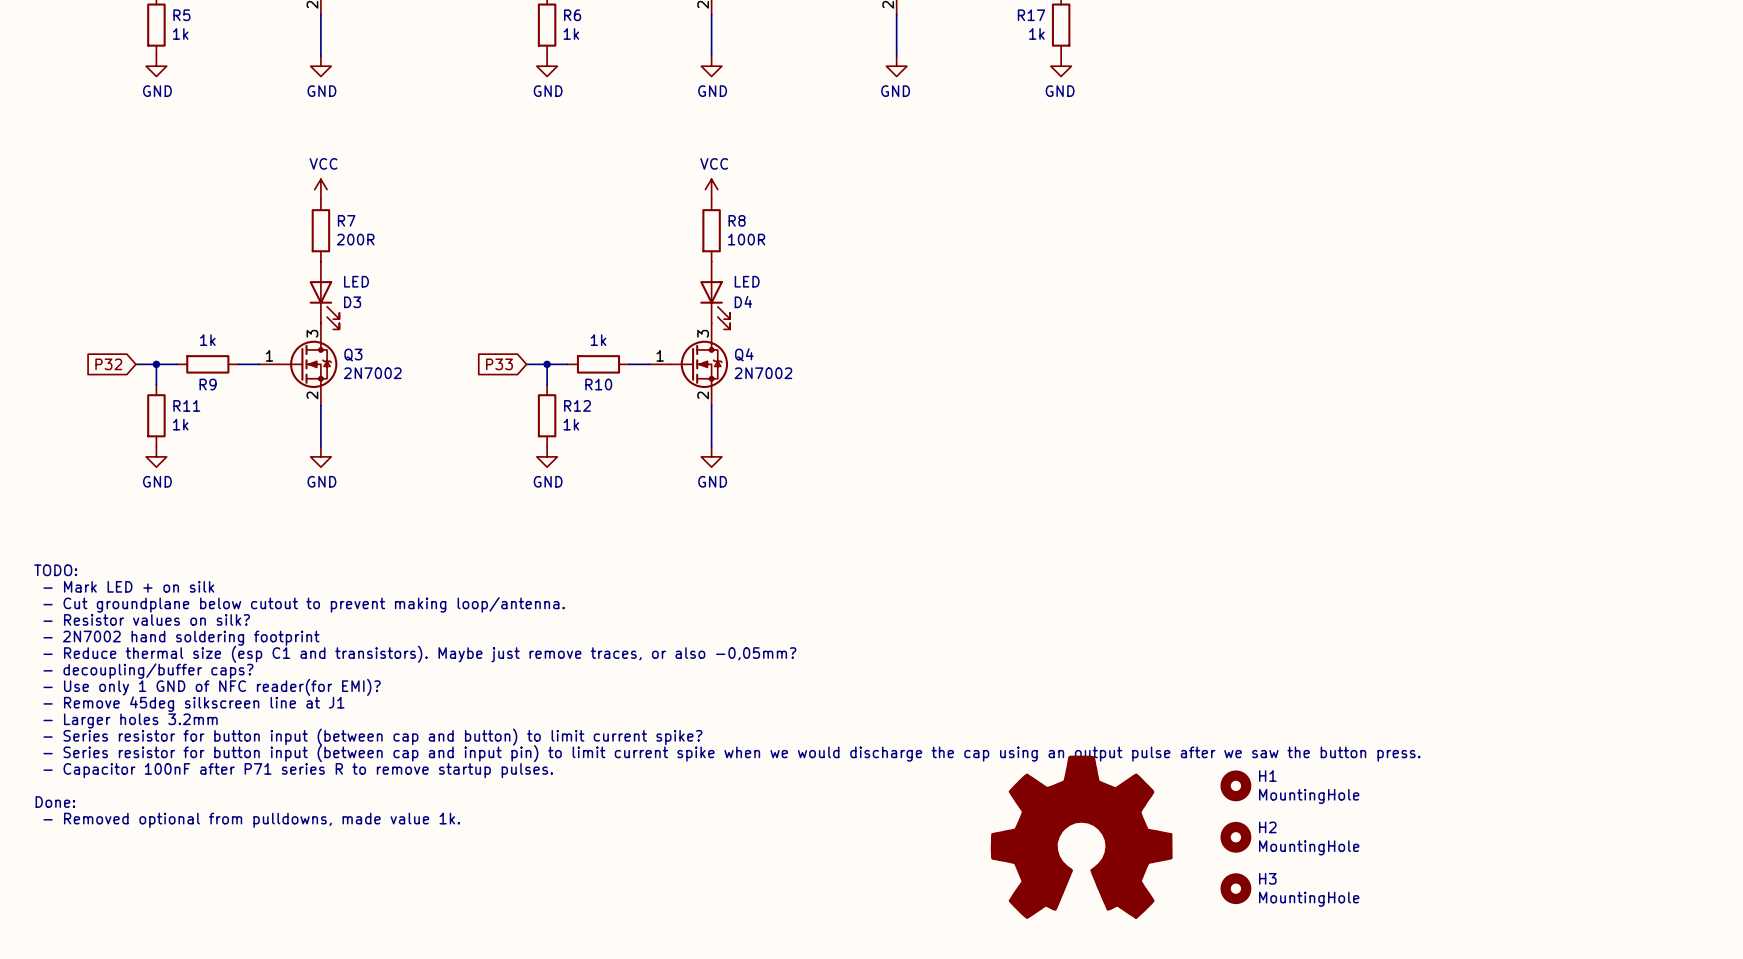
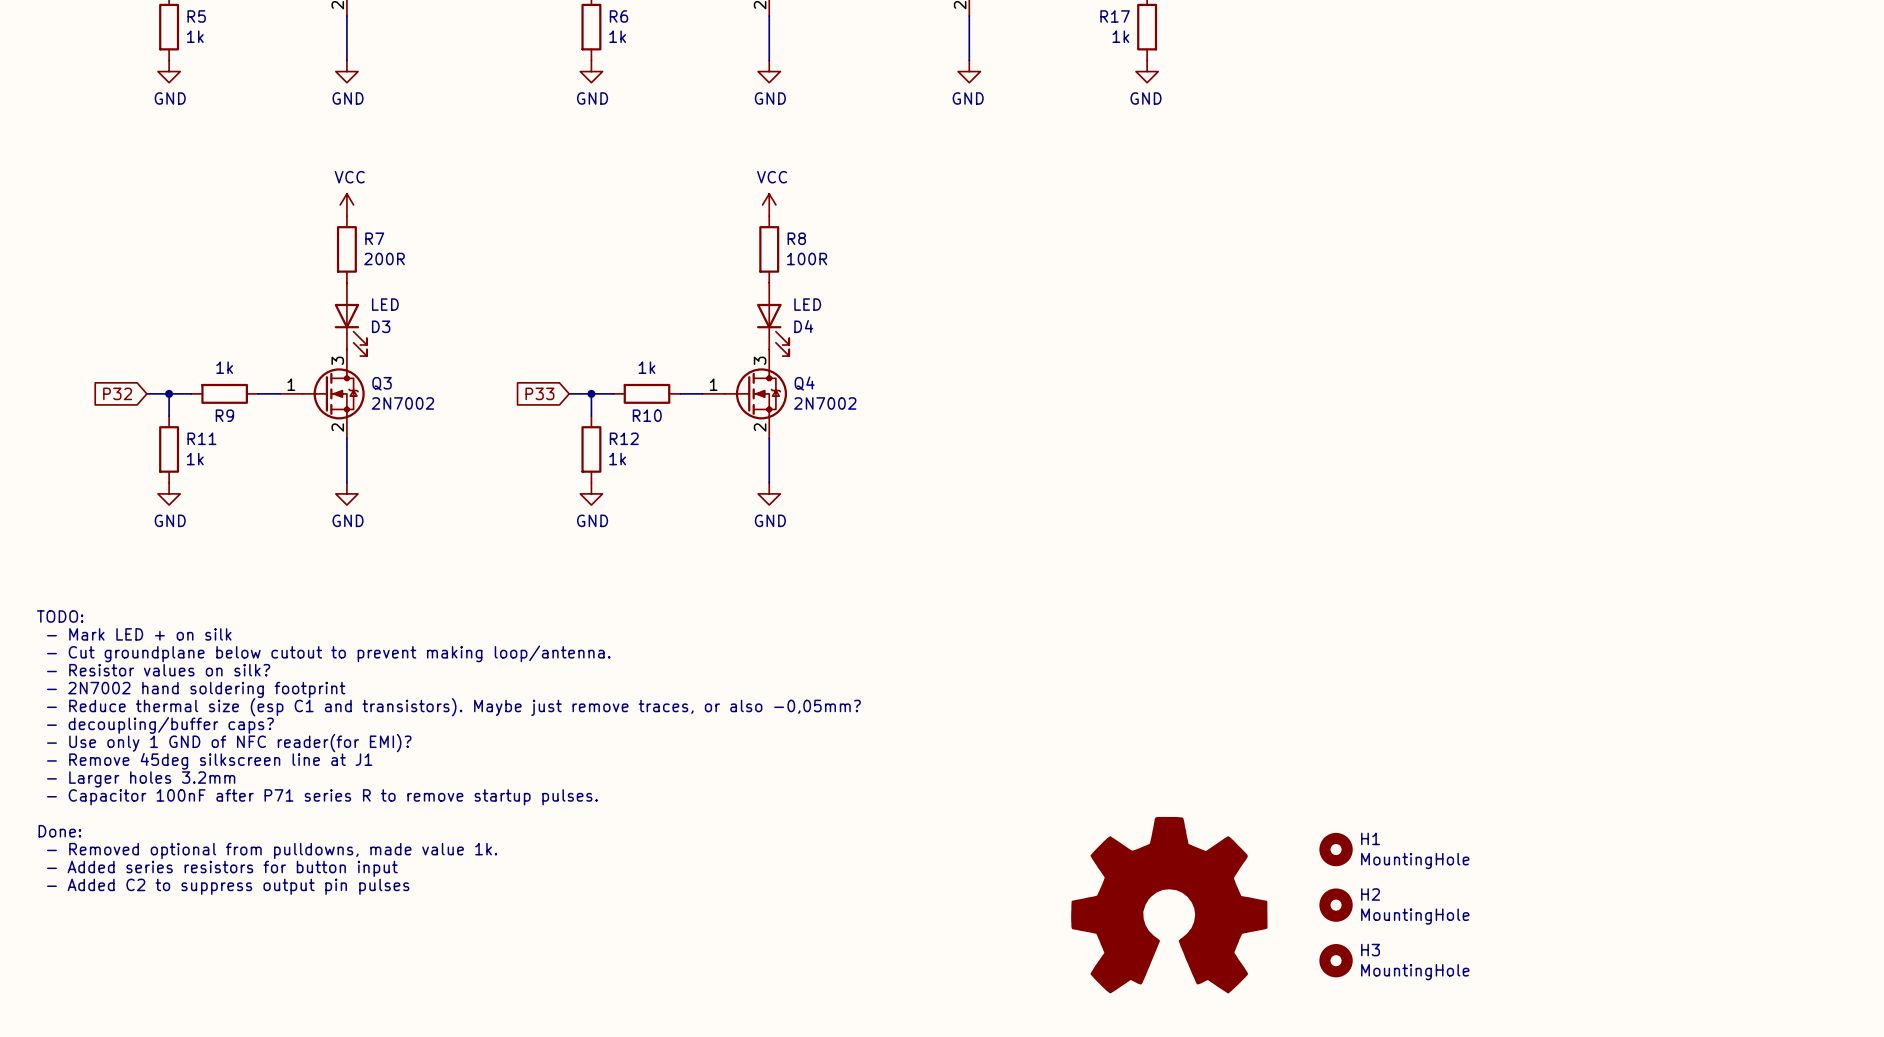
text: - Series resistor for button input (between cap and button) to limit current spike? (372, 737) -> - Capacitor 100nF after P71 series R to remove startup pulses. (322, 797)
text: - Series resistor for button input (between cap and input pin) to limit current spike when we would discharge the cap using an output pulse after we saw the button press. (731, 753) -> none
text: - Capacitor 100nF after P71 series R to remove startup pulses. (298, 770) -> Done: (59, 831)
text: none -> - Removed optional from pulldowns, made value 1k. (272, 850)
text: Done: (55, 802) -> - Added series resistors for button input (222, 868)
text: - Removed optional from pulldowns, made value 1k. (251, 820) -> - Added C2 to suppress output pin pulses (228, 886)

